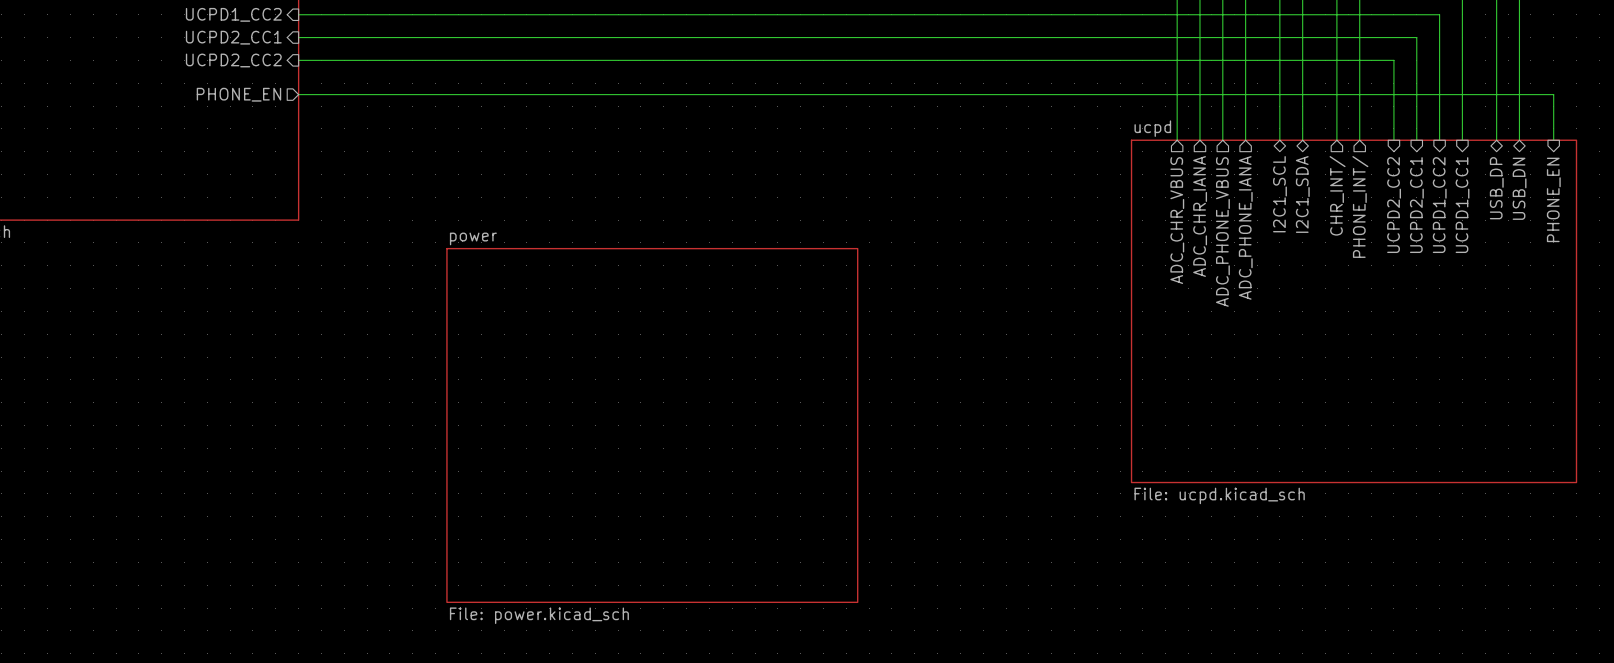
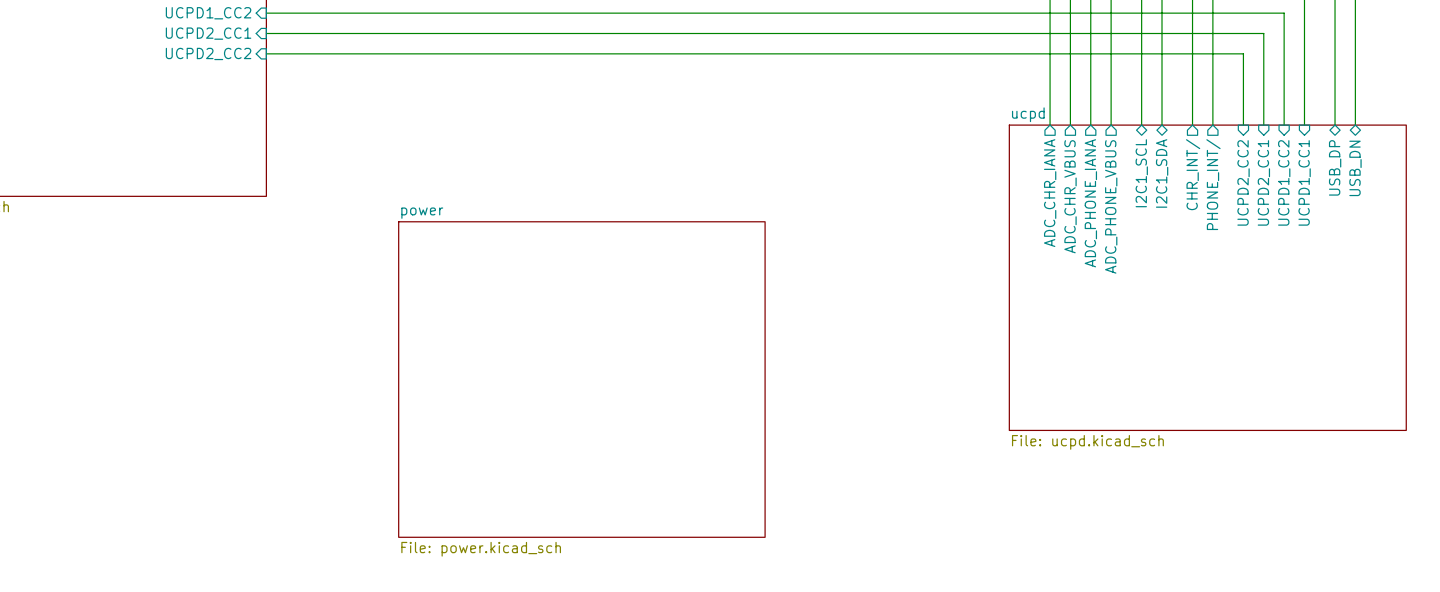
sheet pin: PHONE_EN (238, 94) -> none
wire: (298, 94) (1553, 94) (1553, 140) -> none
sheet pin: PHONE_EN (1553, 199) -> none
sheet pin: ADC_CHR_IANA (1200, 216) -> ADC_CHR_VBUS (1070, 196)
sheet pin: ADC_CHR_VBUS (1177, 220) -> ADC_CHR_IANA (1050, 193)
sheet pin: ADC_PHONE_IANA (1245, 227) -> ADC_PHONE_VBUS (1111, 206)
sheet pin: ADC_PHONE_VBUS (1222, 231) -> ADC_PHONE_IANA (1090, 203)

